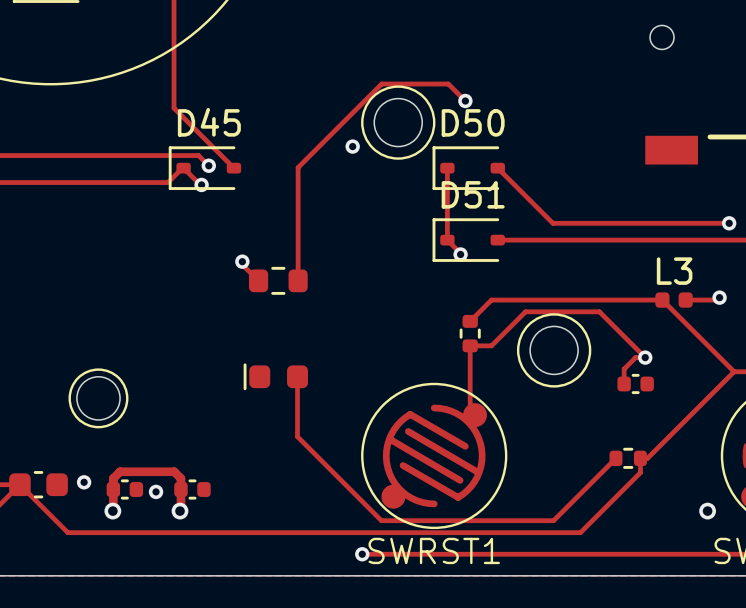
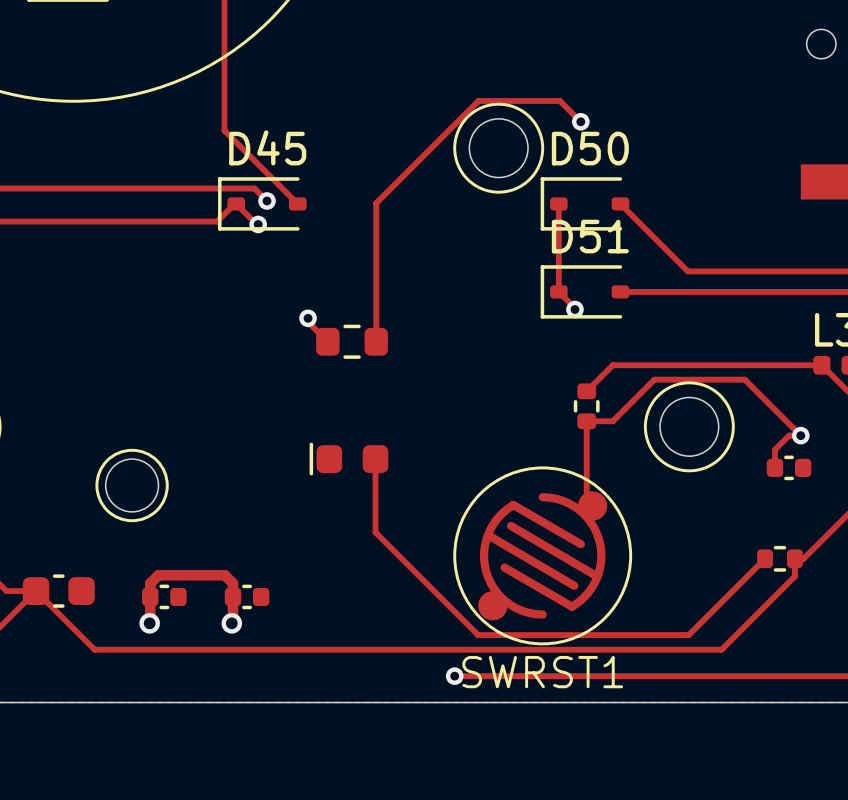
via: (352, 146) -> none
via: (84, 482) -> none
via: (156, 491) -> none

